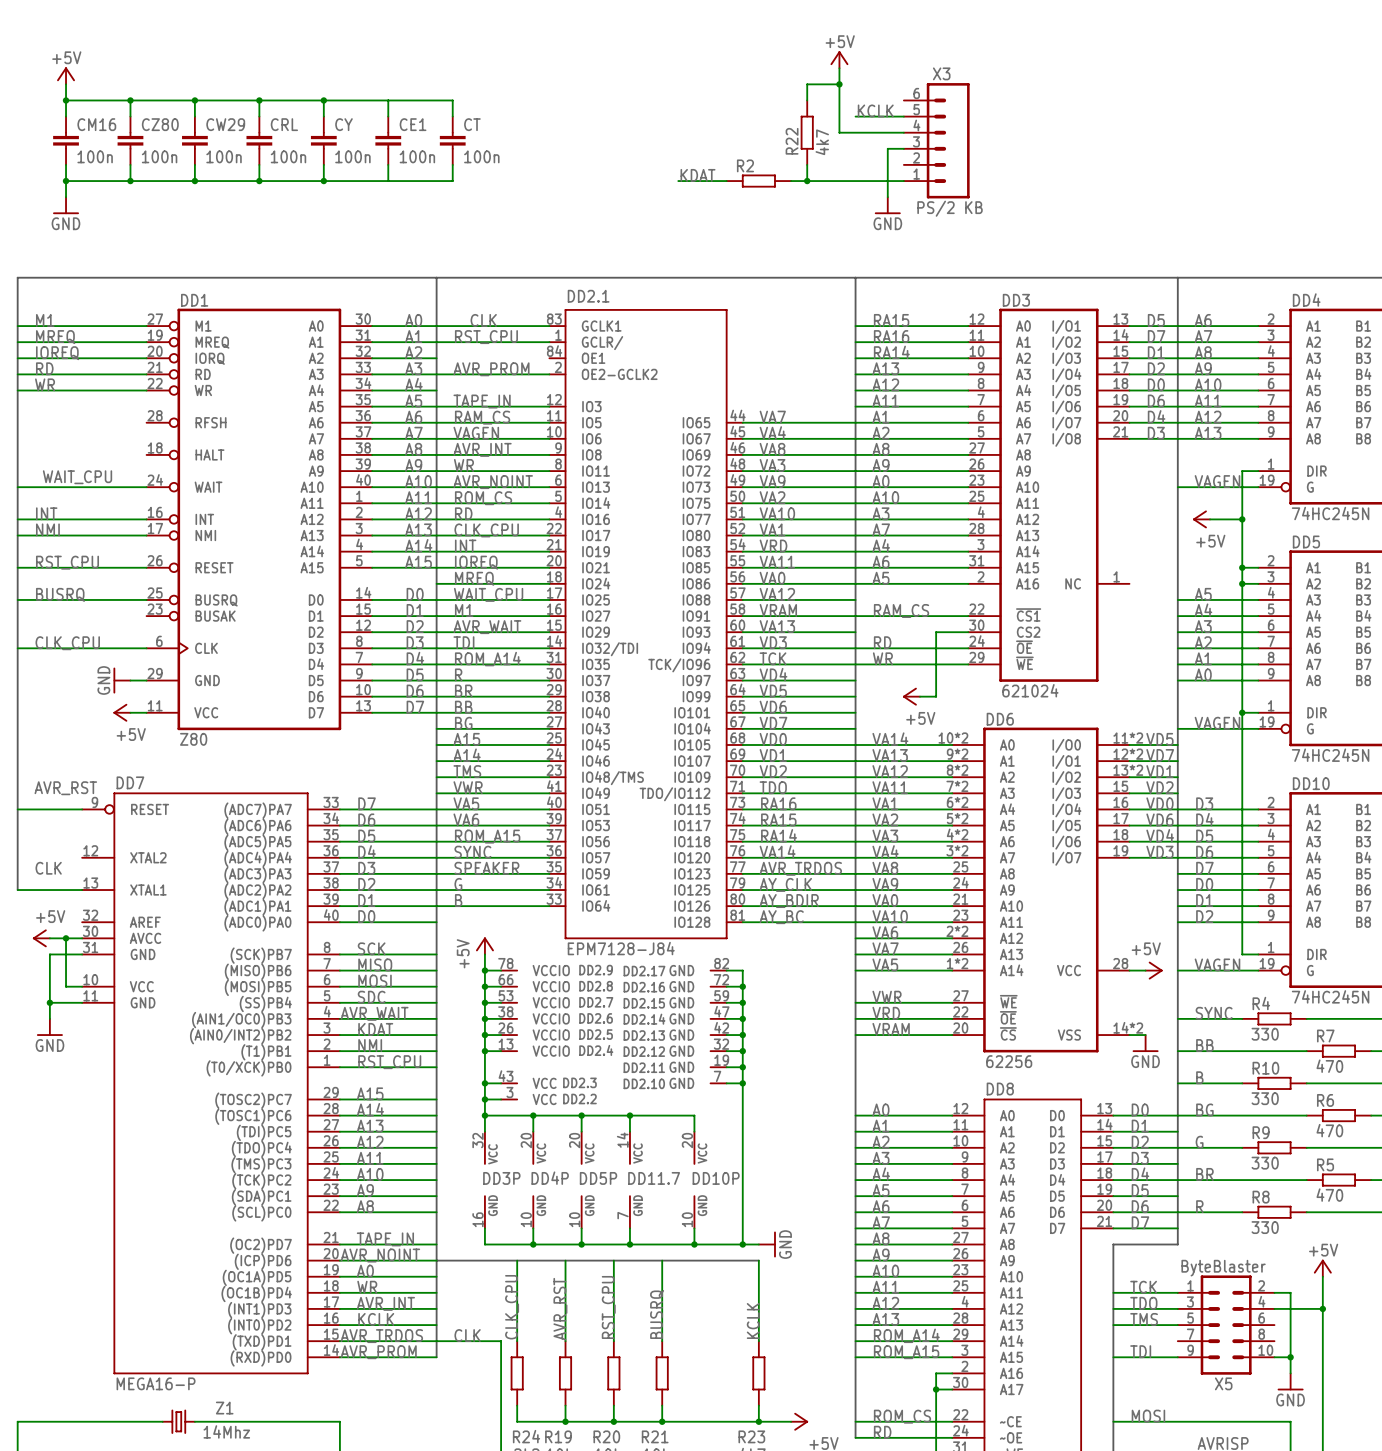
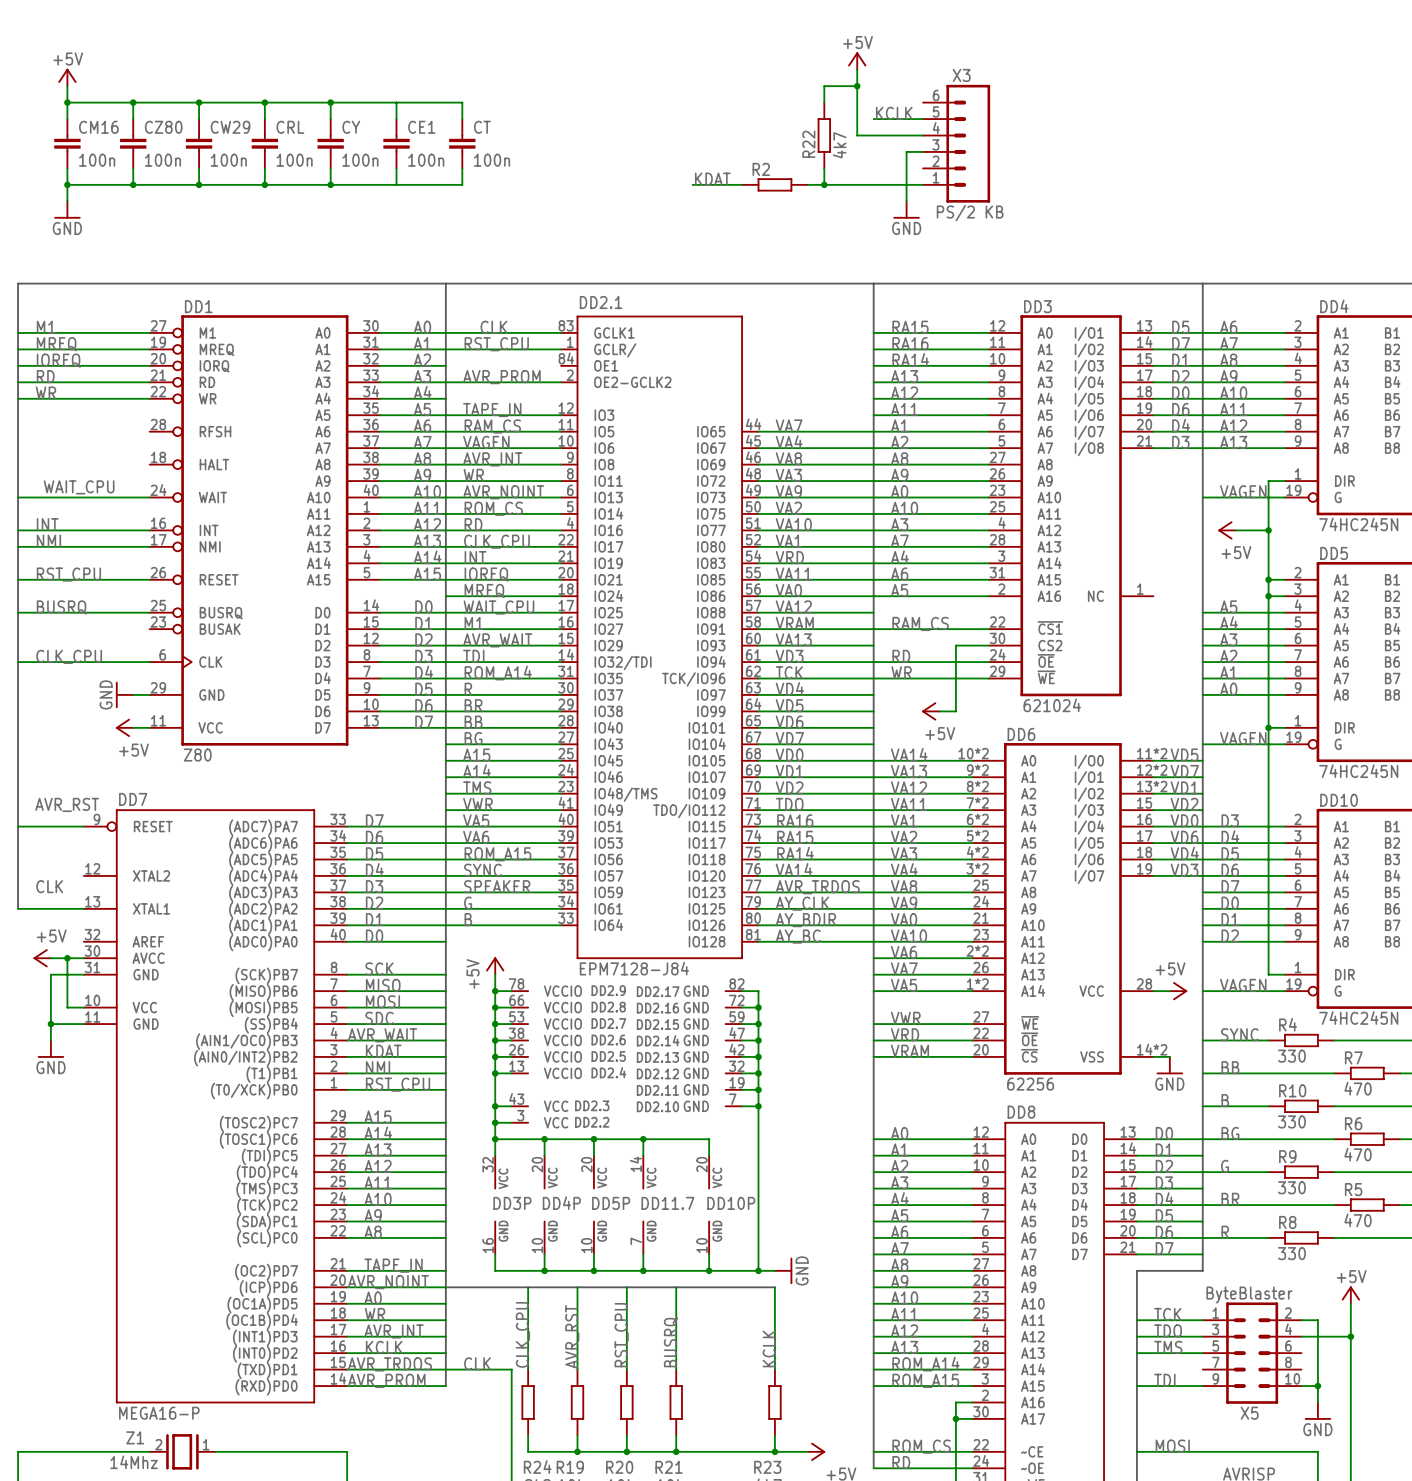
Z1 name position: Z1 (224, 1408) -> Z1 (135, 1437)
Z1 symbol: [162, 1409, 196, 1434] -> [149, 1434, 216, 1470]
Z1 value position: 14Mhz (226, 1431) -> 14Mhz (134, 1462)

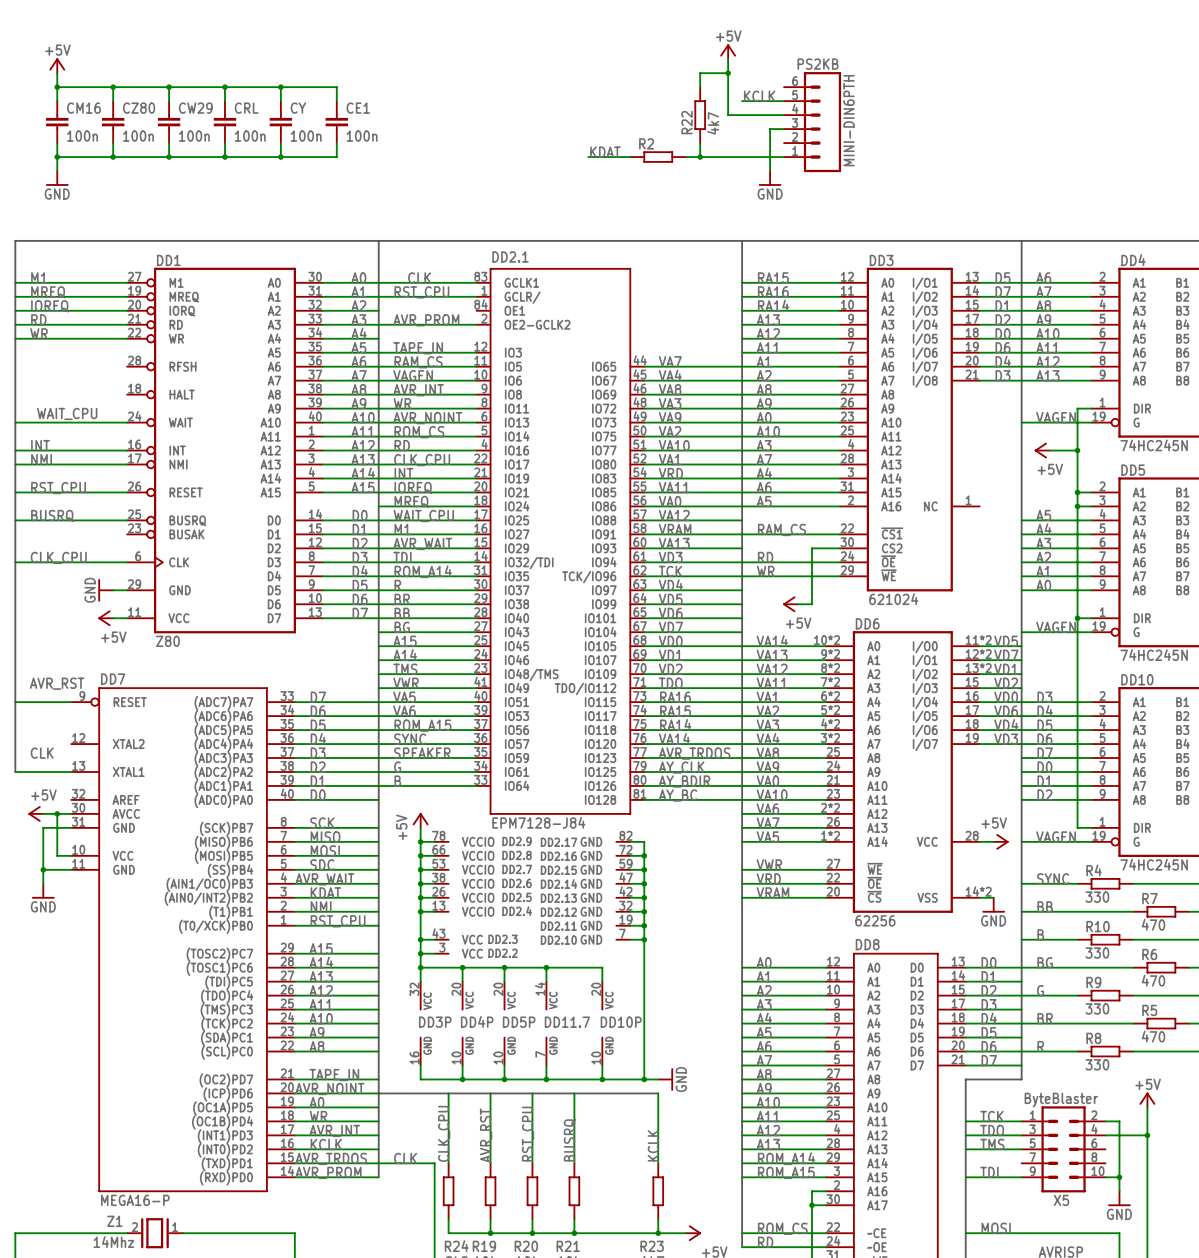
X3 name: X3 (961, 75) -> PS2KB (818, 64)
wire: (396, 102) (462, 102) (462, 119) -> none
CT: 100n (462, 143) -> none
wire: (462, 168) (462, 184) (396, 184) -> none
X3 value: PS/2 KB (970, 213) -> MINI-DIN6PTH (849, 120)

